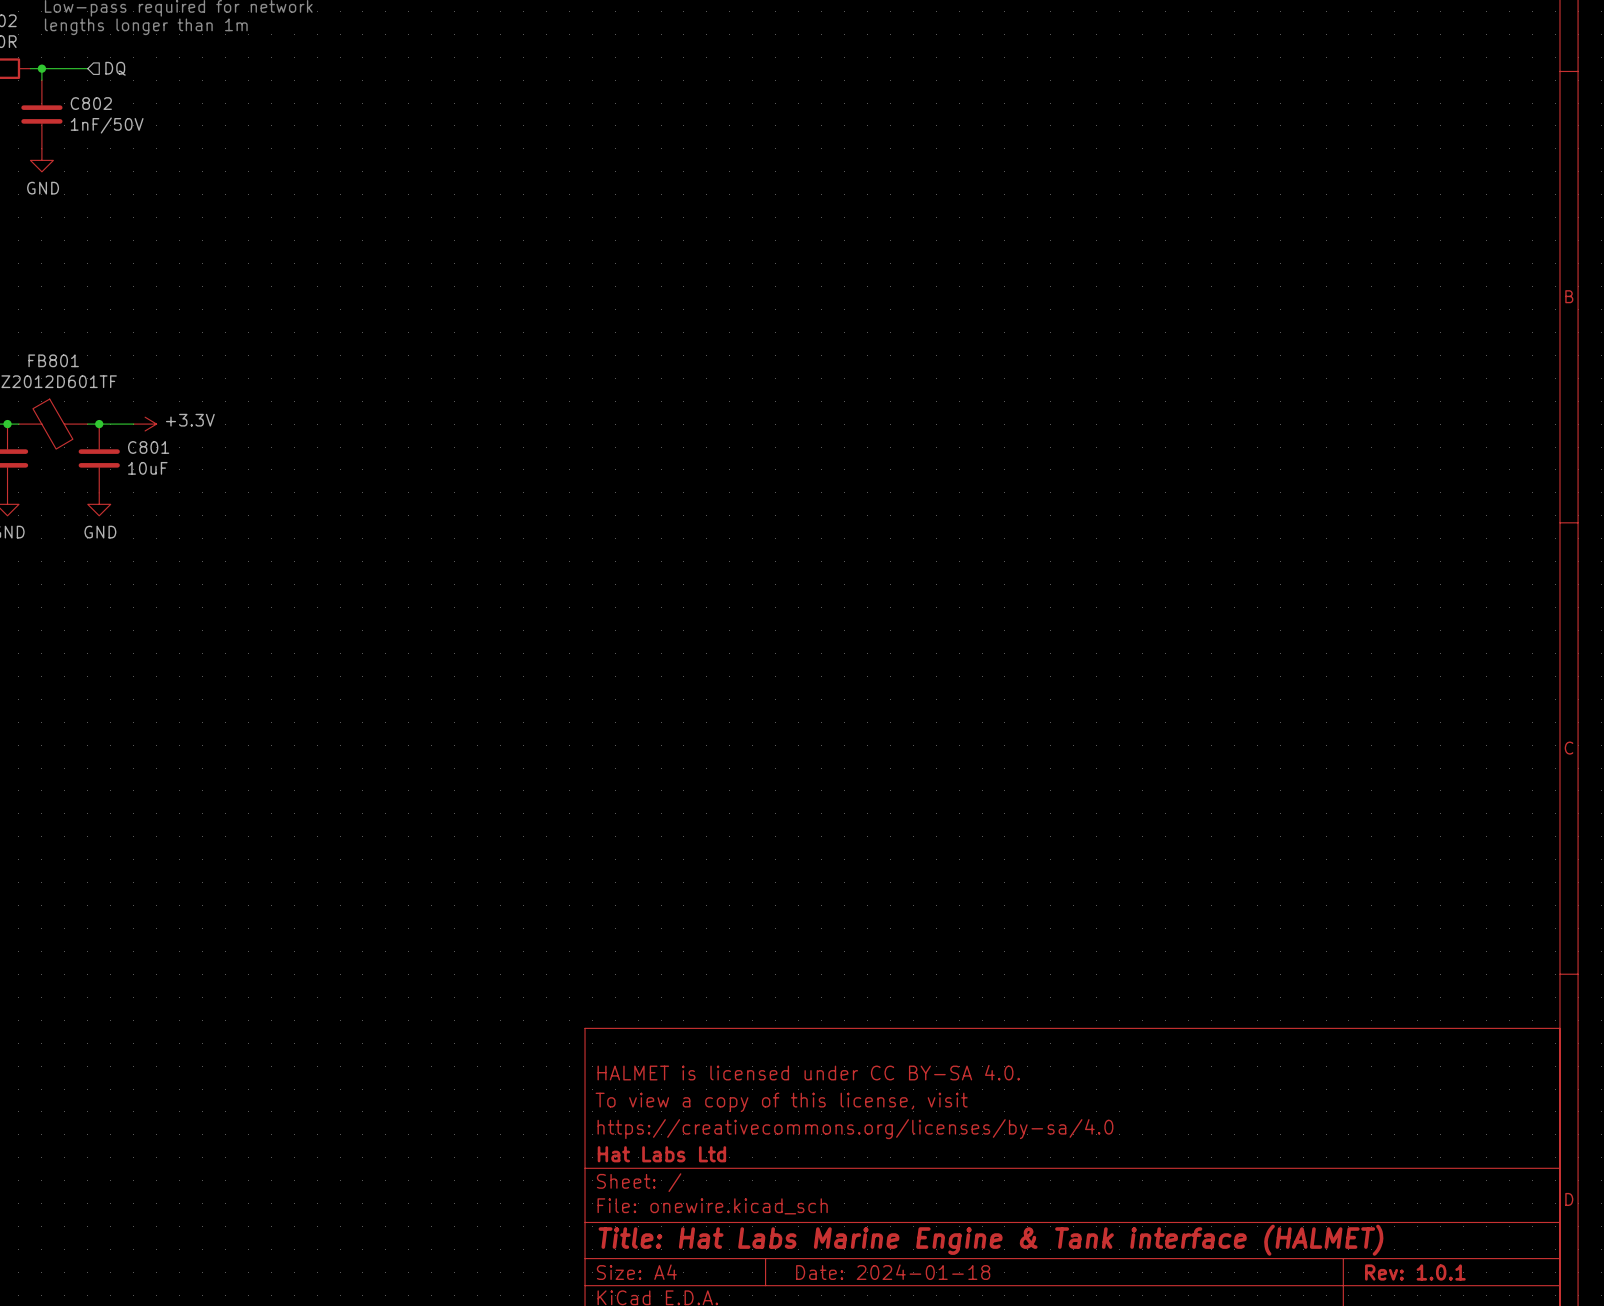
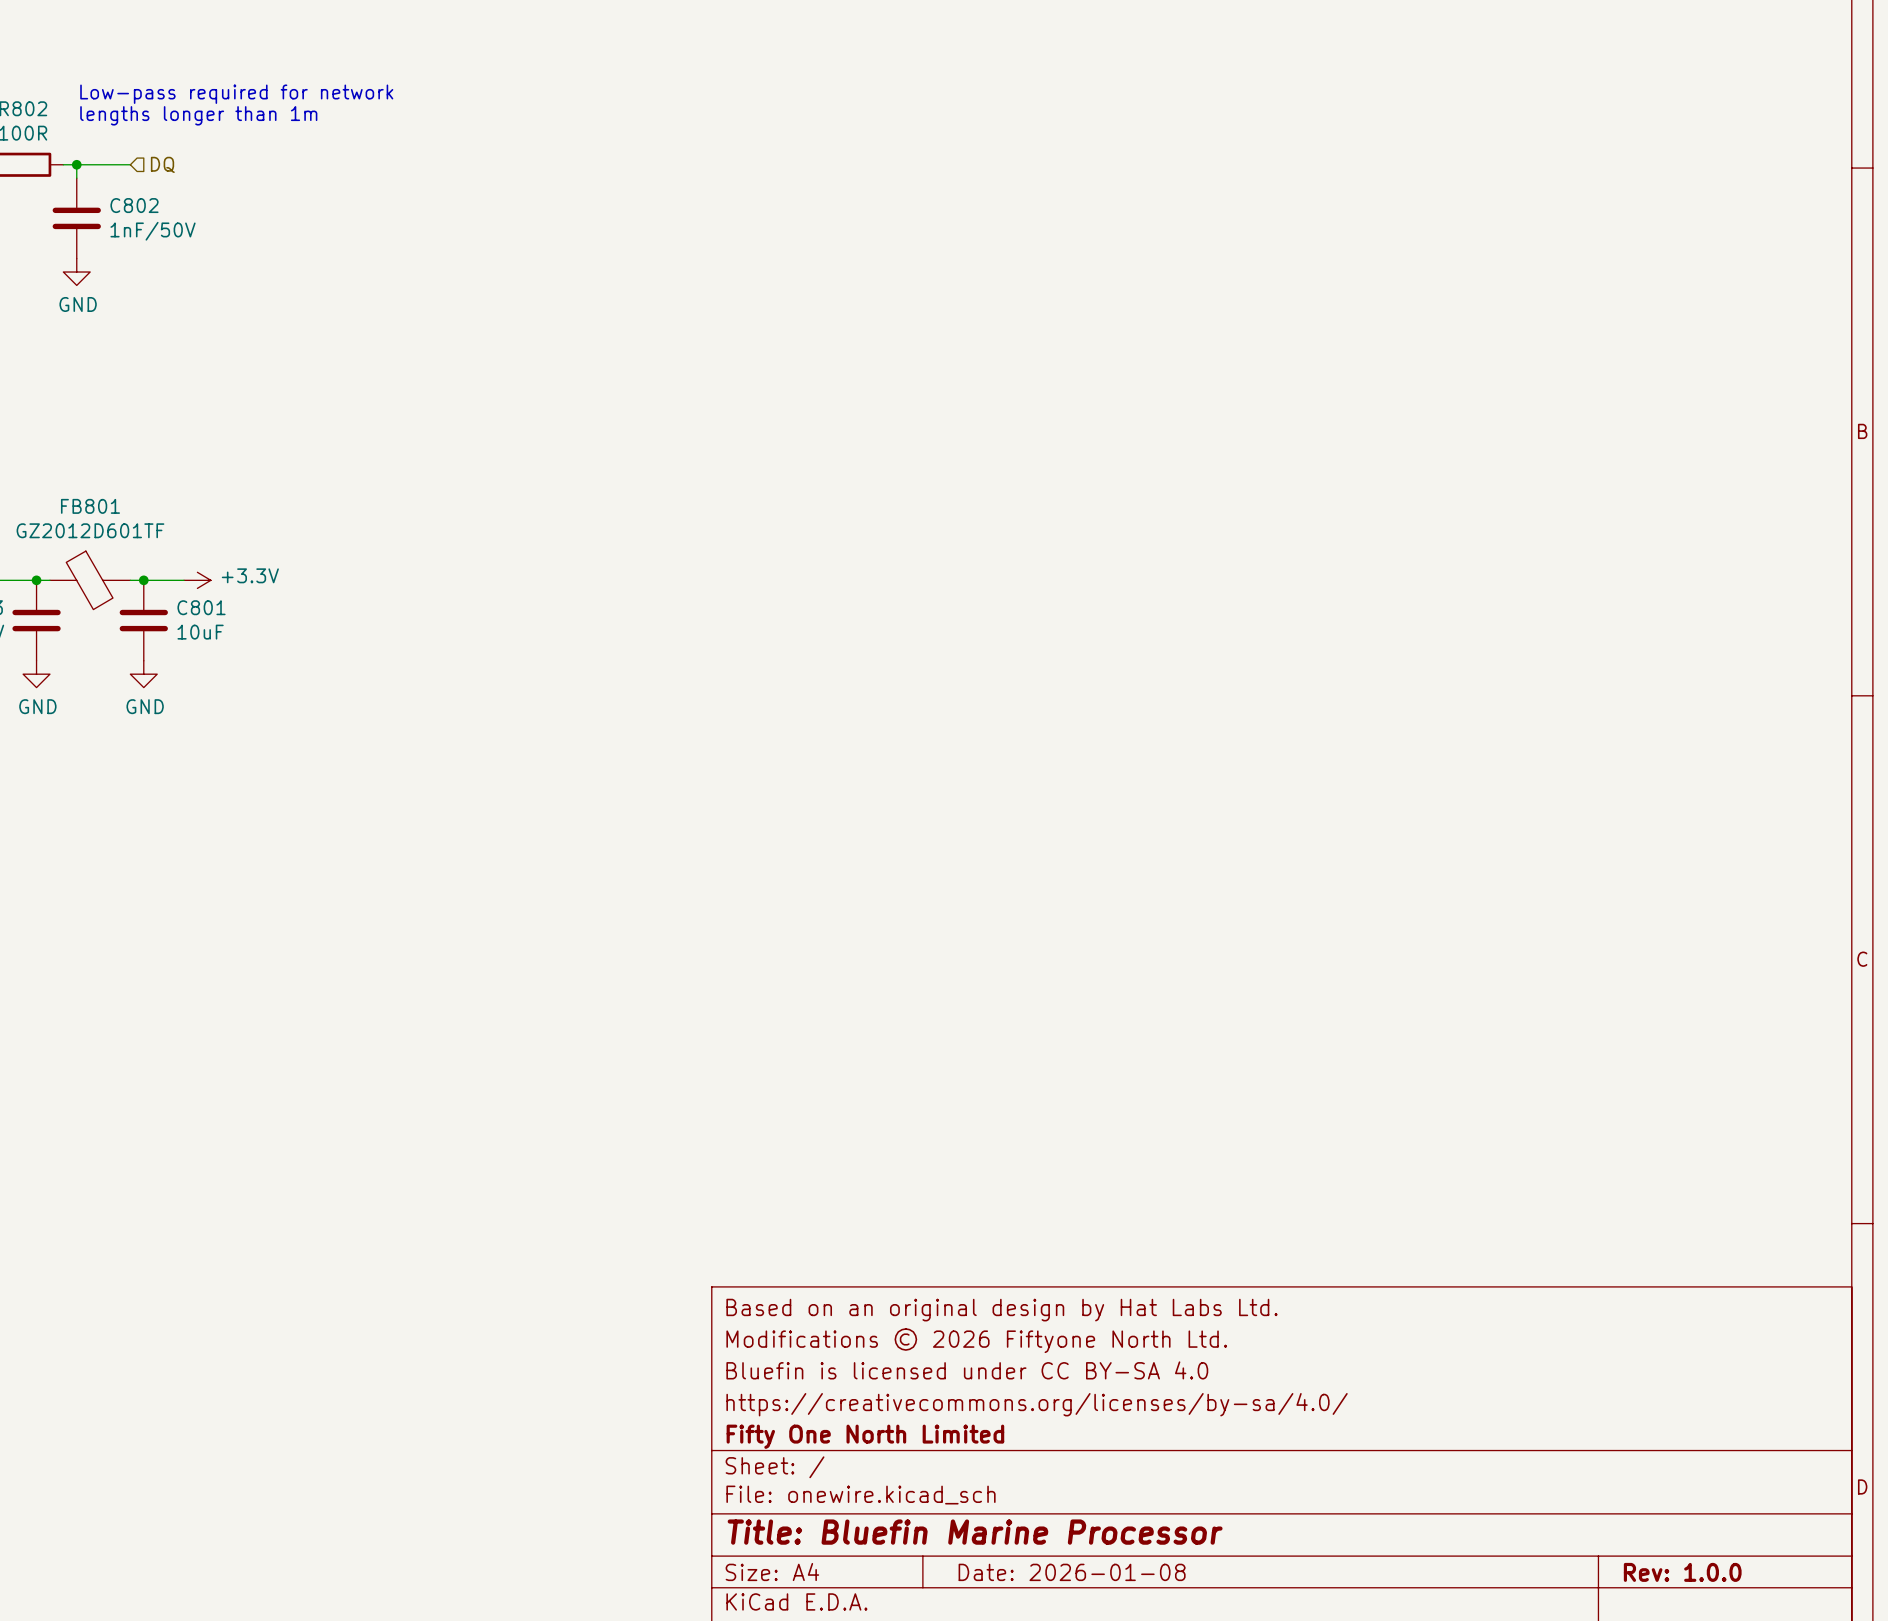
title block: none -> Based on an original design by Hat Labs Ltd. (1001, 1310)
title block: HALMET is licensed under CC BY-SA 4.0. (808, 1072) -> Modifications © 2026 Fiftyone North Ltd. (976, 1340)
title block: To view a copy of this license, visit (781, 1102) -> Bluefin is licensed under CC BY-SA 4.0 (967, 1370)
title block: https://creativecommons.org/licenses/by-sa/4.0 (855, 1129) -> https://creativecommons.org/licenses/by-sa/4.0/ (1037, 1404)
title block: Hat Labs Ltd (661, 1154) -> Fifty One North Limited (865, 1436)
title block: Title: Hat Labs Marine Engine & Tank interface (HALMET) (991, 1240) -> Title: Bluefin Marine Processor (975, 1532)
title block: Date: 2024-01-18 (893, 1272) -> Date: 2026-01-08 (1072, 1572)
title block: Rev: 1.0.1 (1415, 1272) -> Rev: 1.0.0 (1682, 1572)

